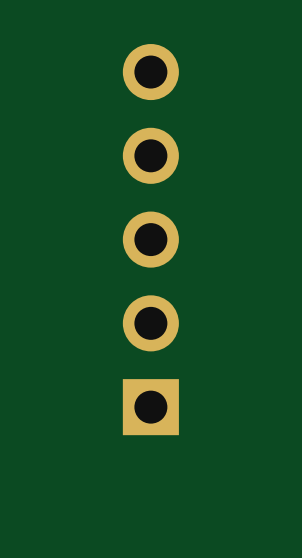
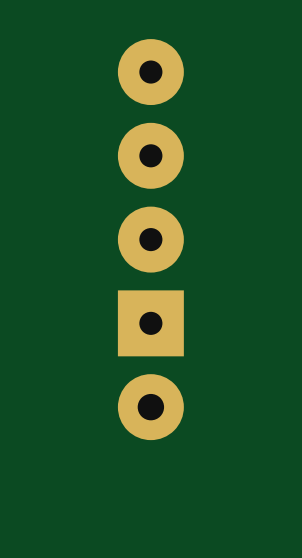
part footprint: [122, 44, 179, 436] -> [117, 39, 184, 441]

